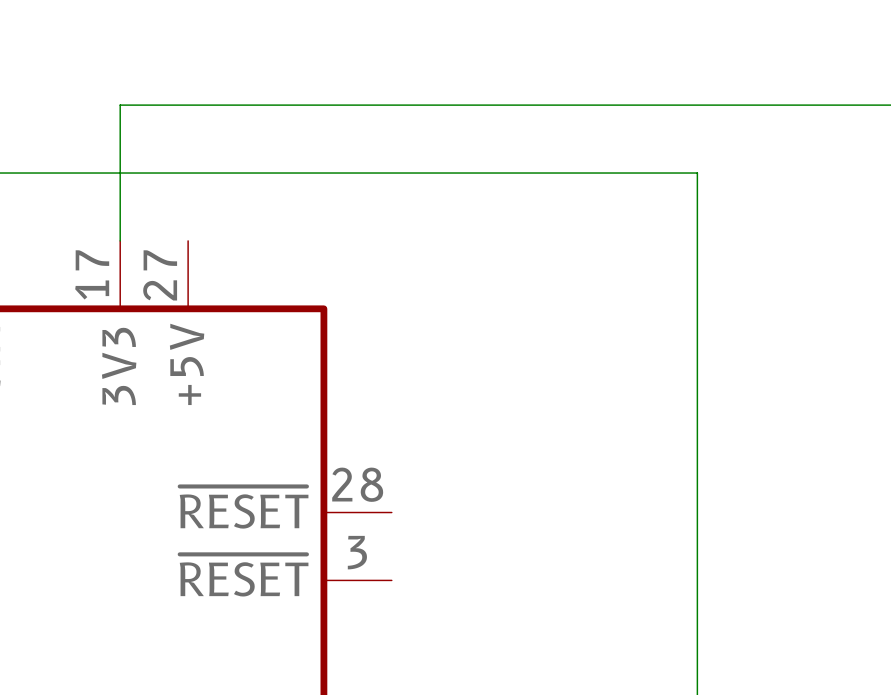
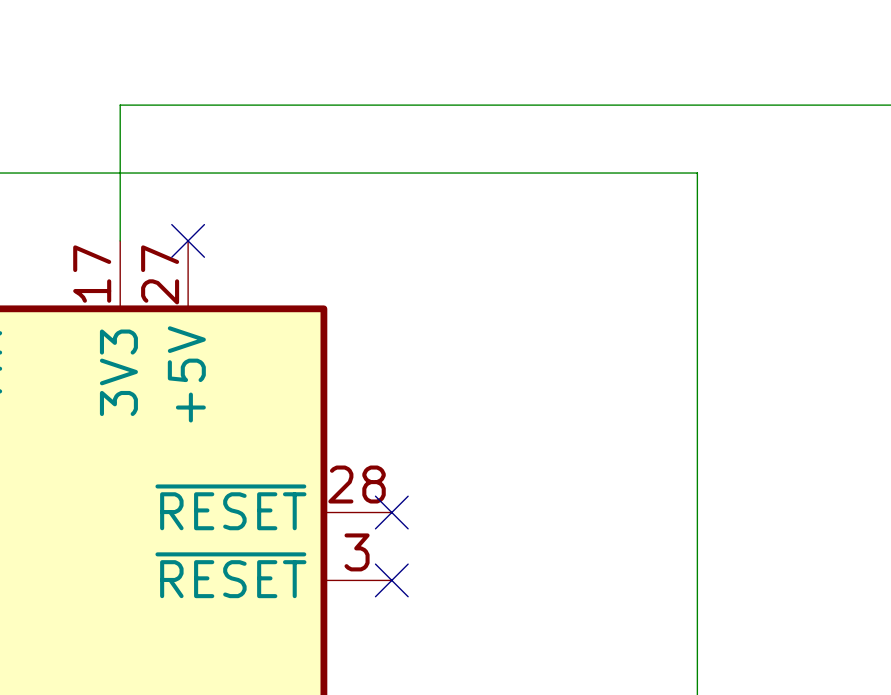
no-connect mark: none -> (188, 240)
no-connect mark: none -> (391, 512)
no-connect mark: none -> (391, 580)

